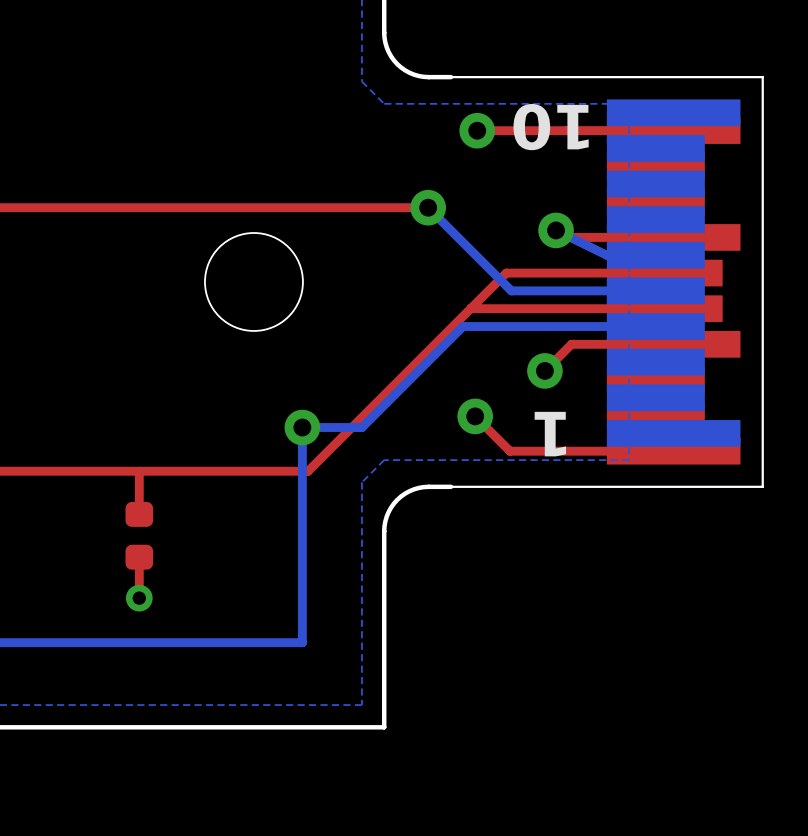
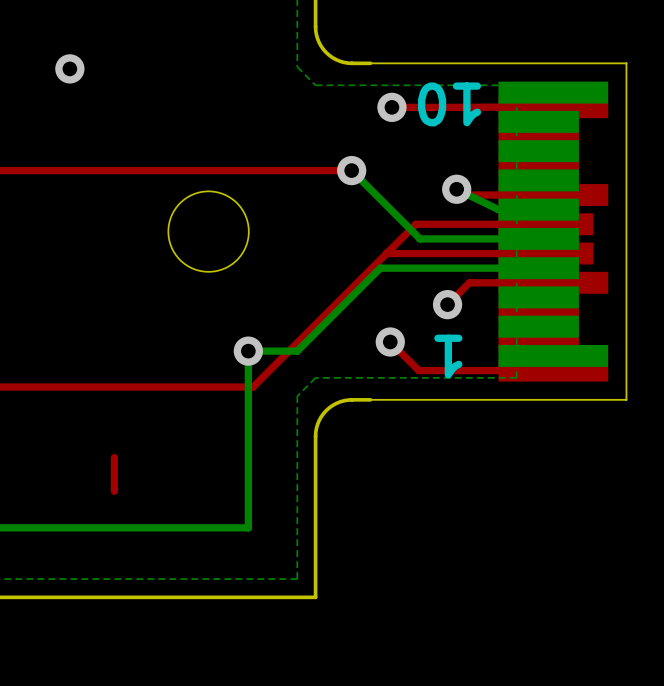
via: none -> (69, 68)
top track: (139, 471) (139, 514) -> none
part: (139, 535) -> none
via: (139, 598) -> none

